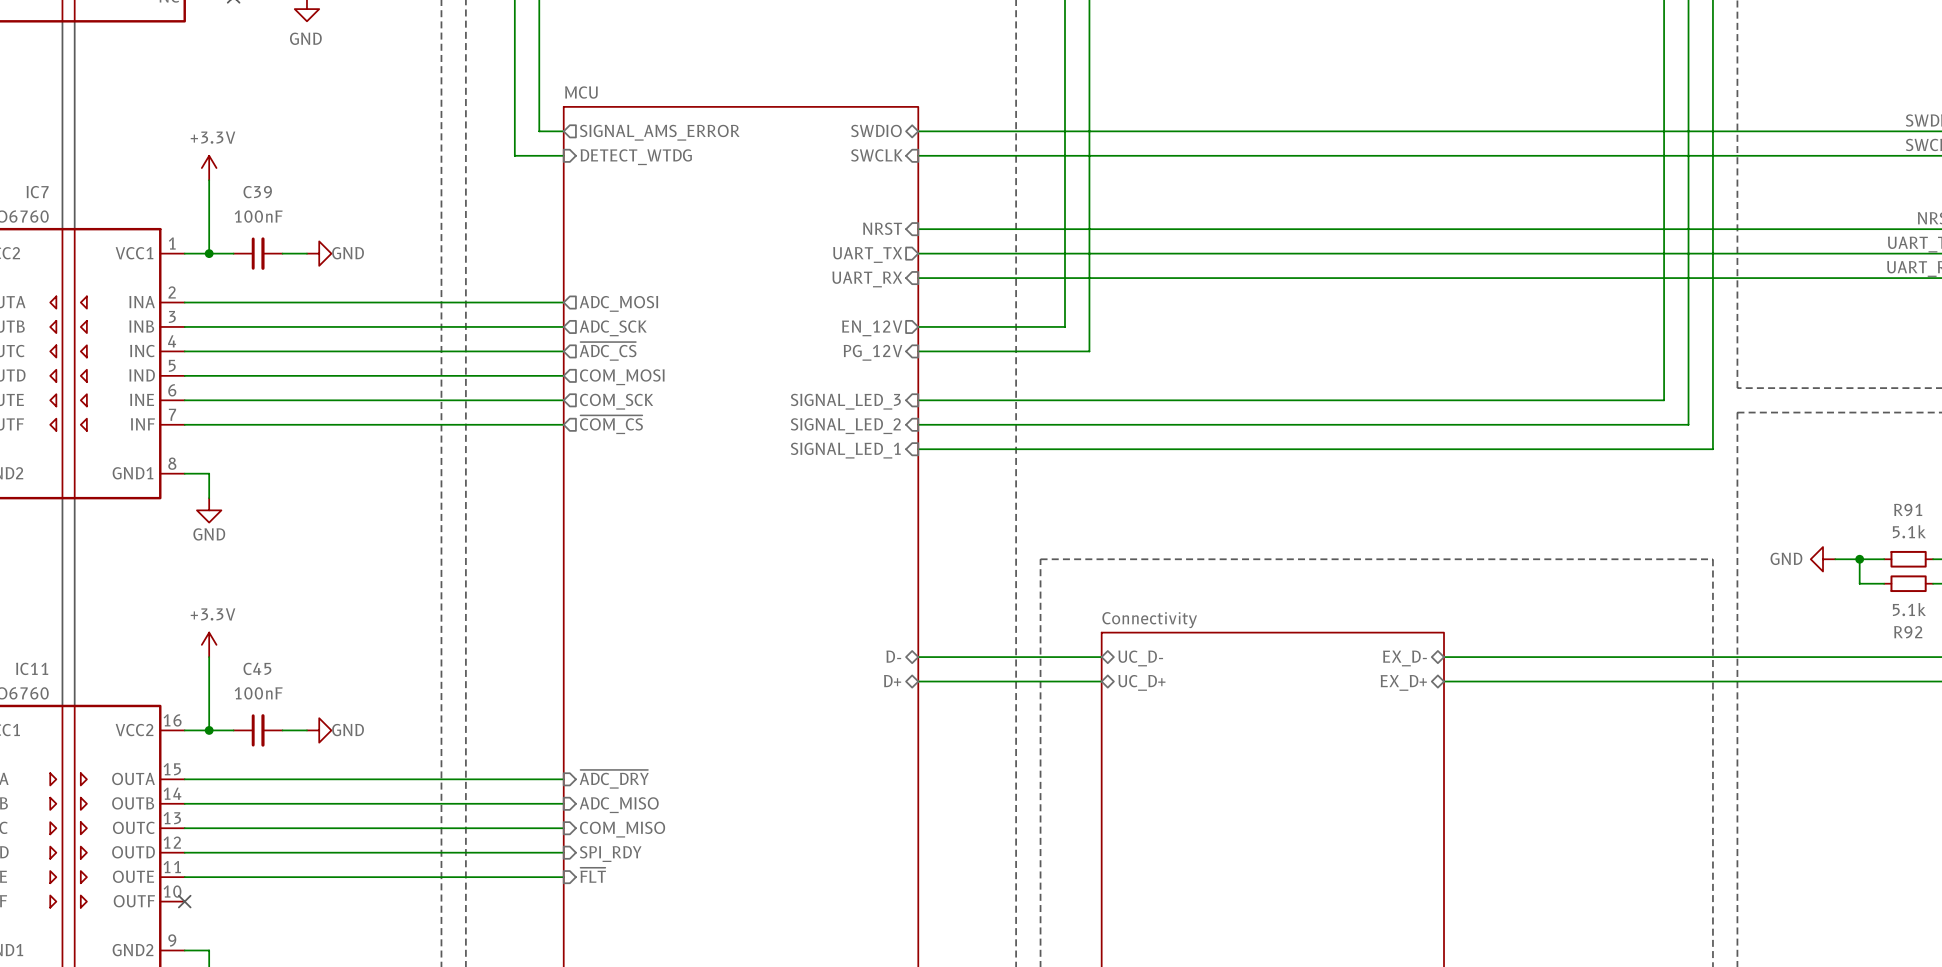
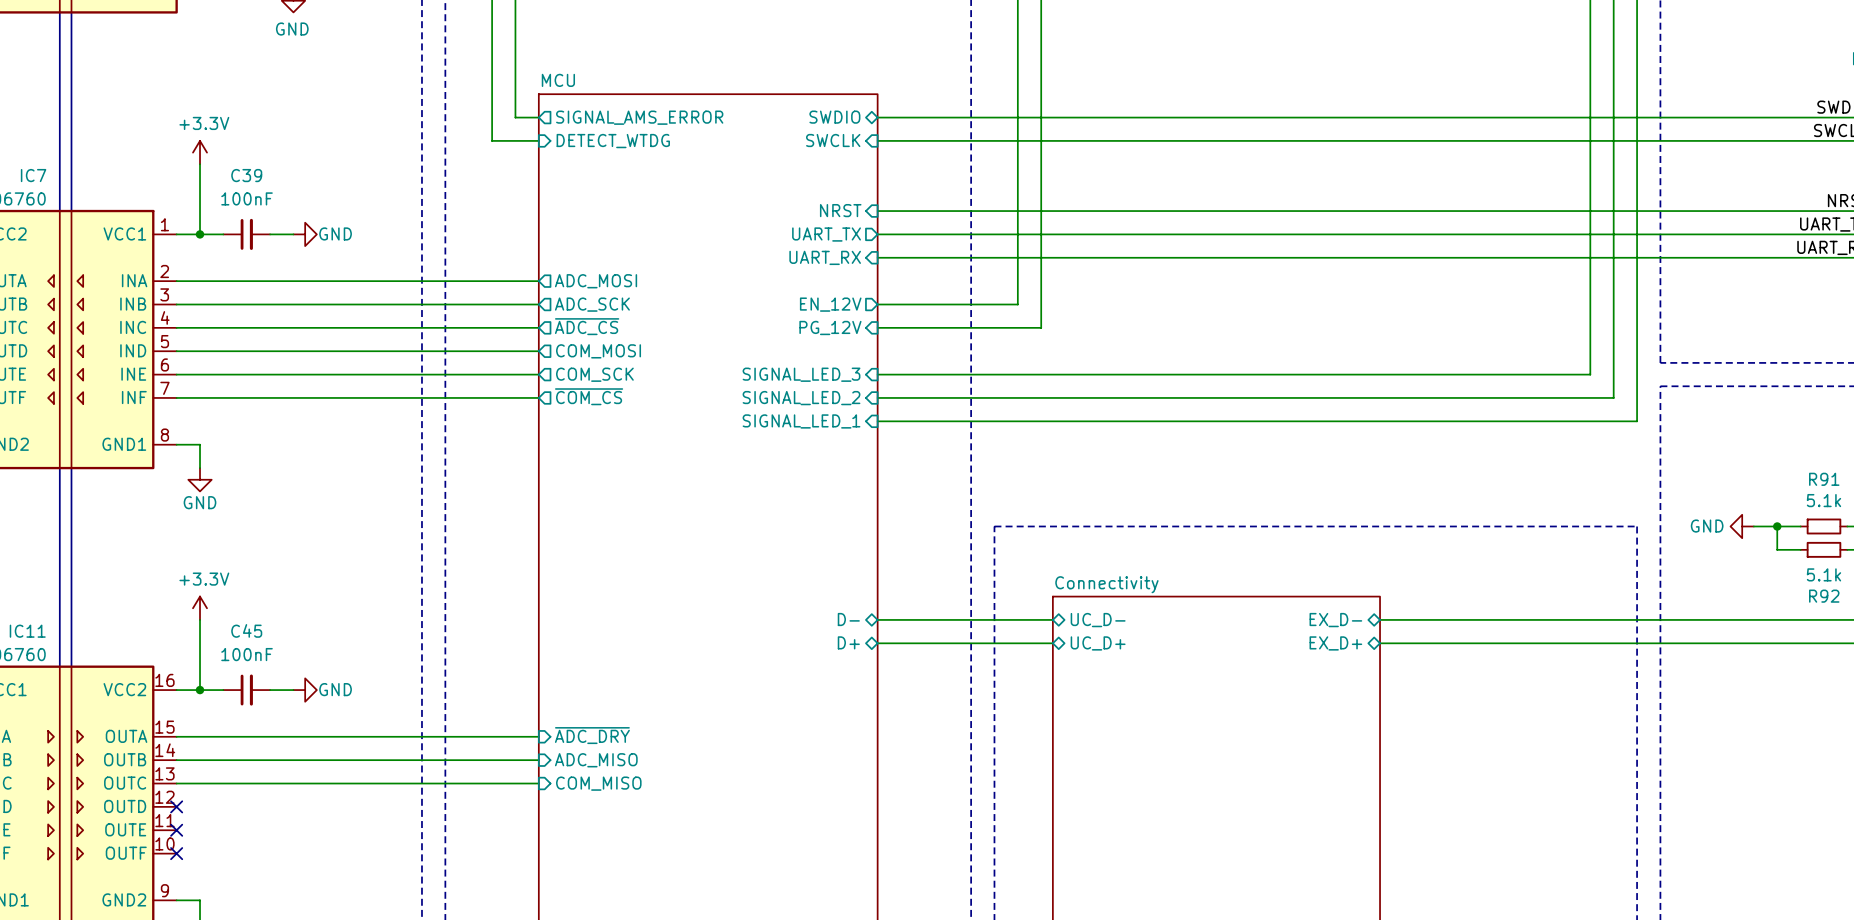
wire: (184, 852) (563, 852) -> none
no-connect mark: none -> (176, 806)
sheet pin: SPI_RDY (610, 854) -> none
sheet pin: ~{FLT} (593, 875) -> none
wire: (184, 877) (563, 877) -> none
no-connect mark: none -> (176, 830)

